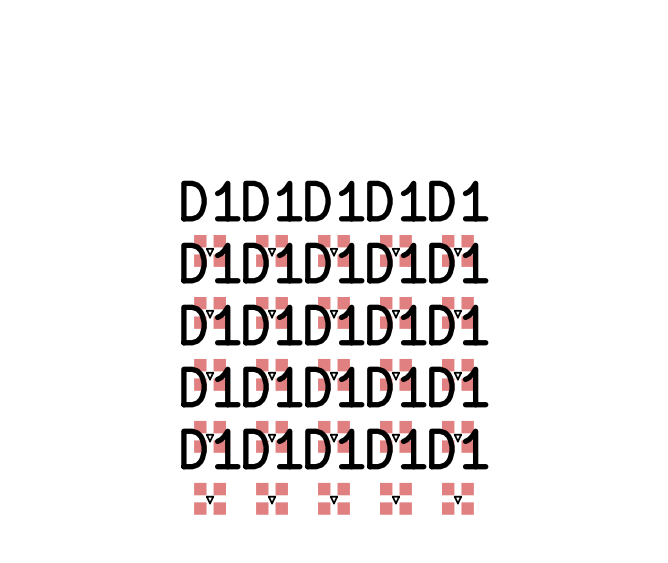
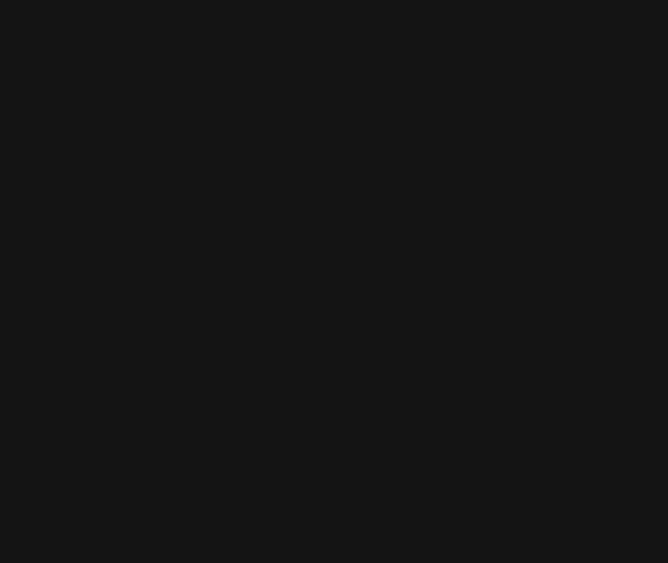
D1: (210, 250) -> none
D1: (272, 250) -> none
D1: (333, 250) -> none
D1: (395, 250) -> none
D1: (457, 250) -> none
D1: (210, 312) -> none
D1: (272, 312) -> none
D1: (333, 312) -> none
D1: (395, 312) -> none
D1: (457, 312) -> none
D1: (210, 374) -> none
D1: (272, 374) -> none
D1: (333, 374) -> none
D1: (395, 374) -> none
D1: (457, 374) -> none
D1: (210, 436) -> none
D1: (272, 436) -> none
D1: (333, 436) -> none
D1: (395, 436) -> none
D1: (457, 436) -> none
D1: (210, 498) -> none
D1: (272, 498) -> none
D1: (333, 498) -> none
D1: (395, 498) -> none
D1: (457, 498) -> none

